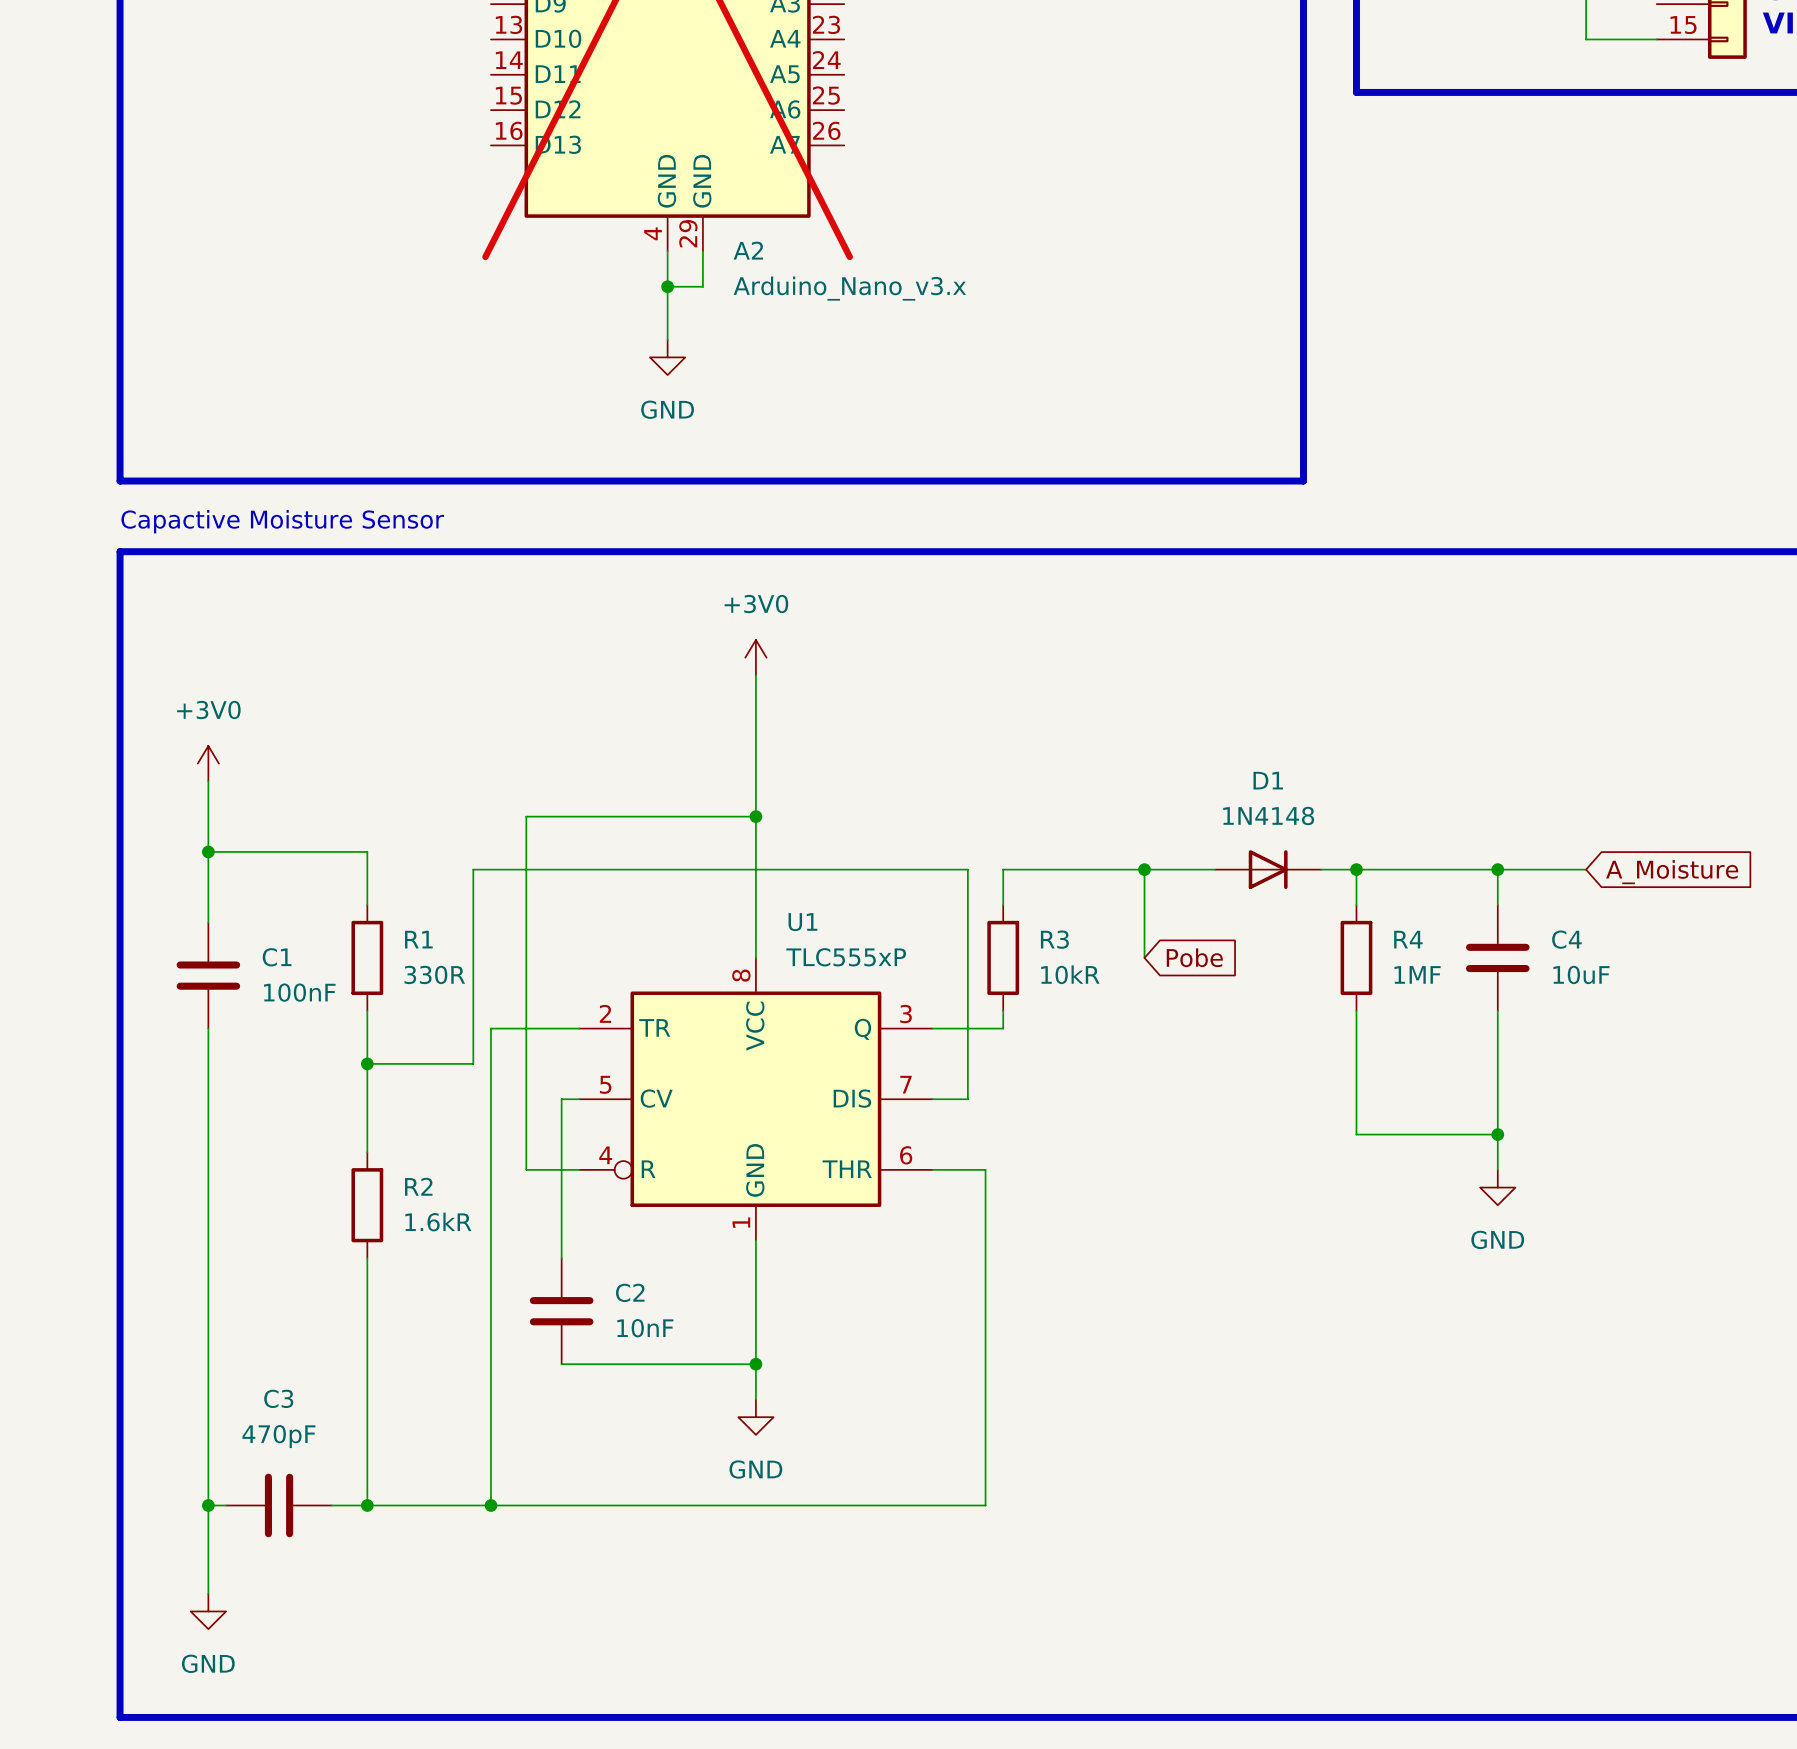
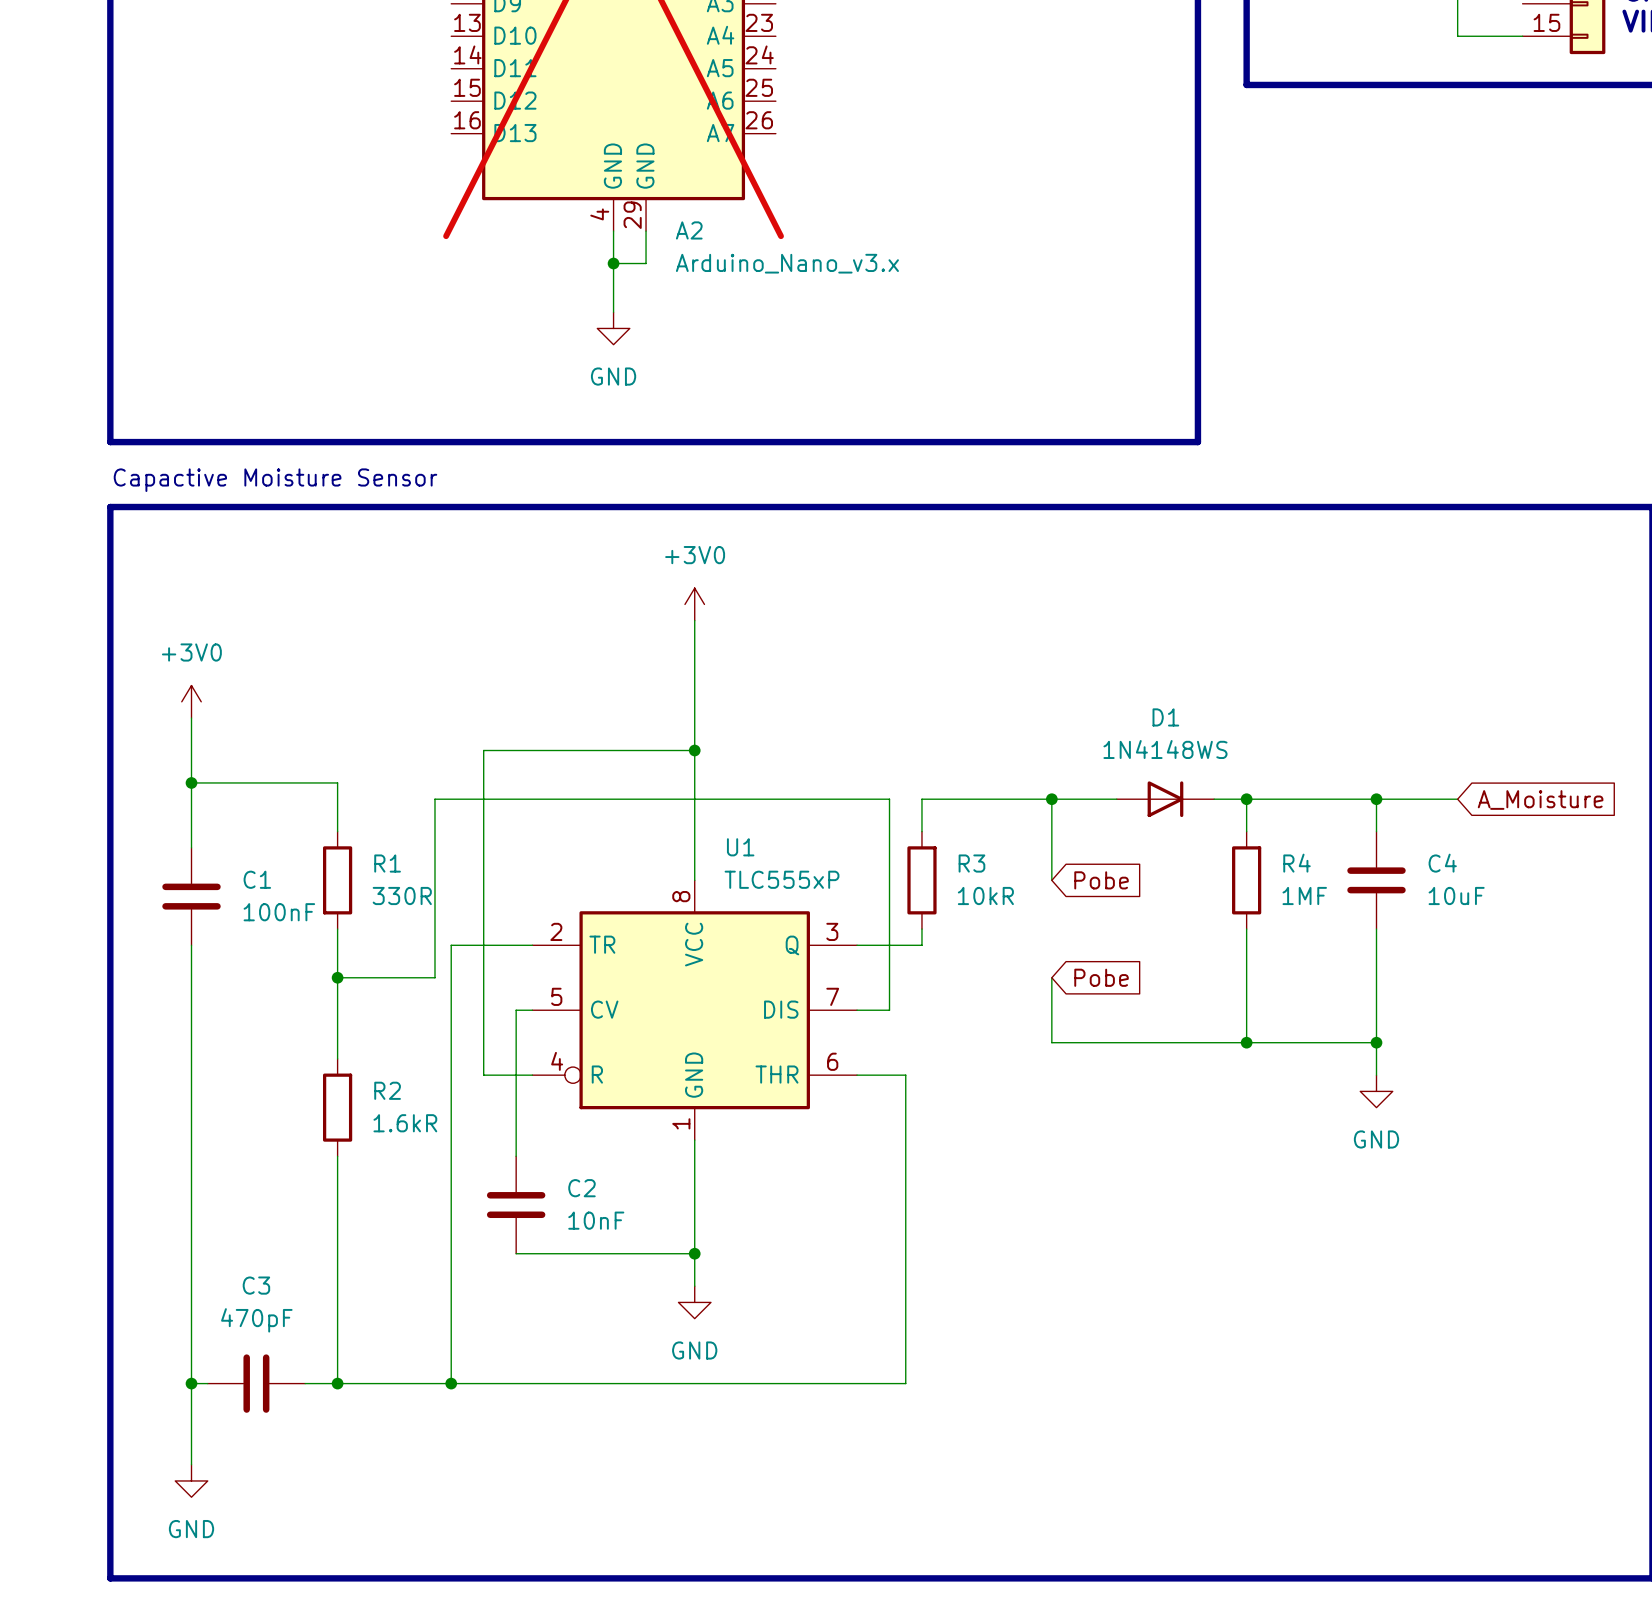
D1 value: 1N4148 (1268, 815) -> 1N4148WS (1165, 749)
wire: none -> (1051, 977) (1051, 1042) (1246, 1042)
global label: none -> Pobe (1101, 977)
junction: none -> (1246, 1042)

